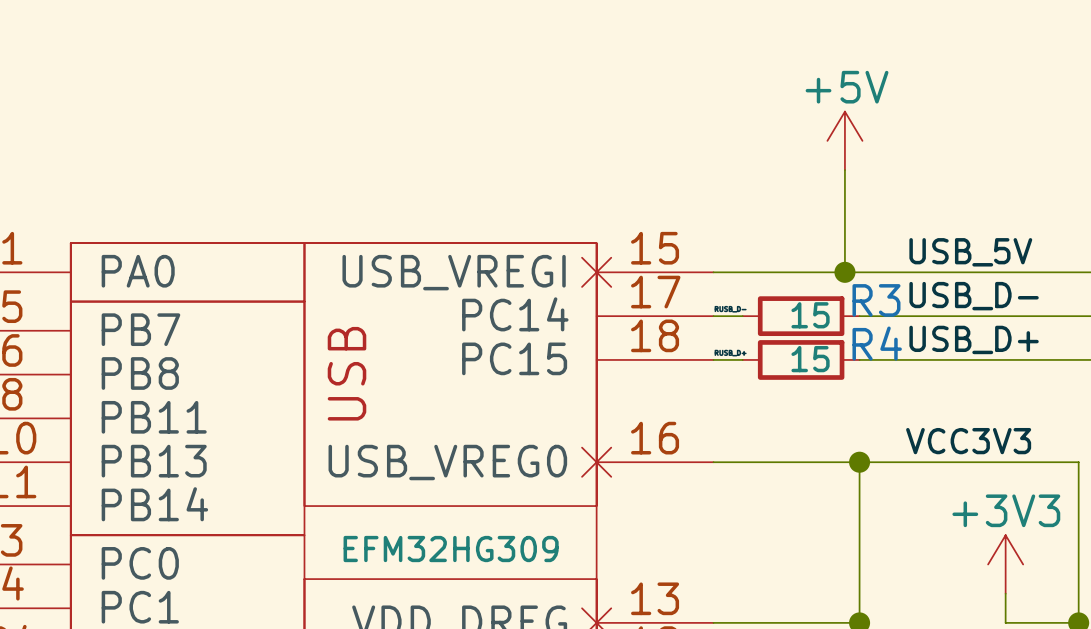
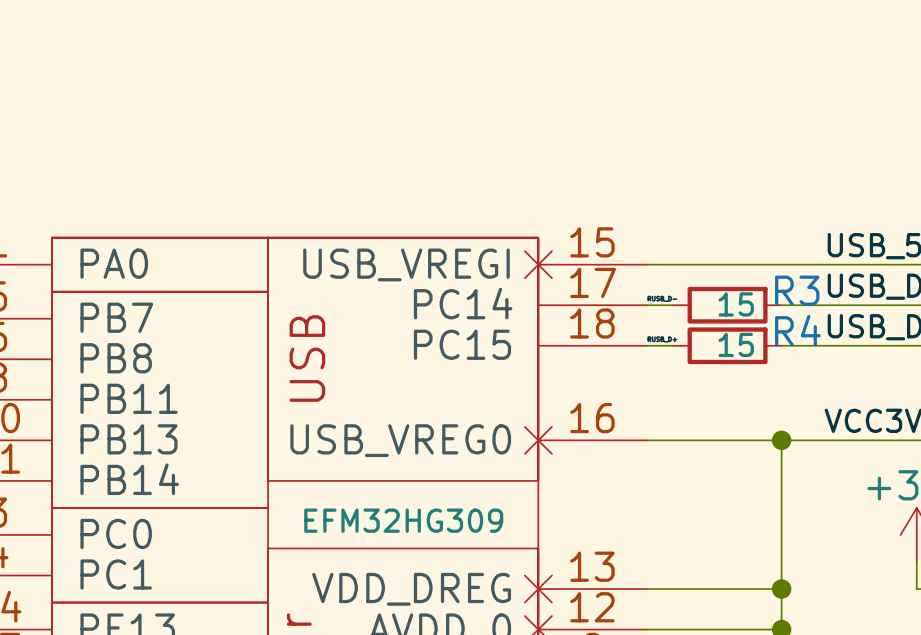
power symbol: +5V (844, 140) -> none
wire: (844, 170) (844, 272) -> none
junction: (844, 272) -> none

